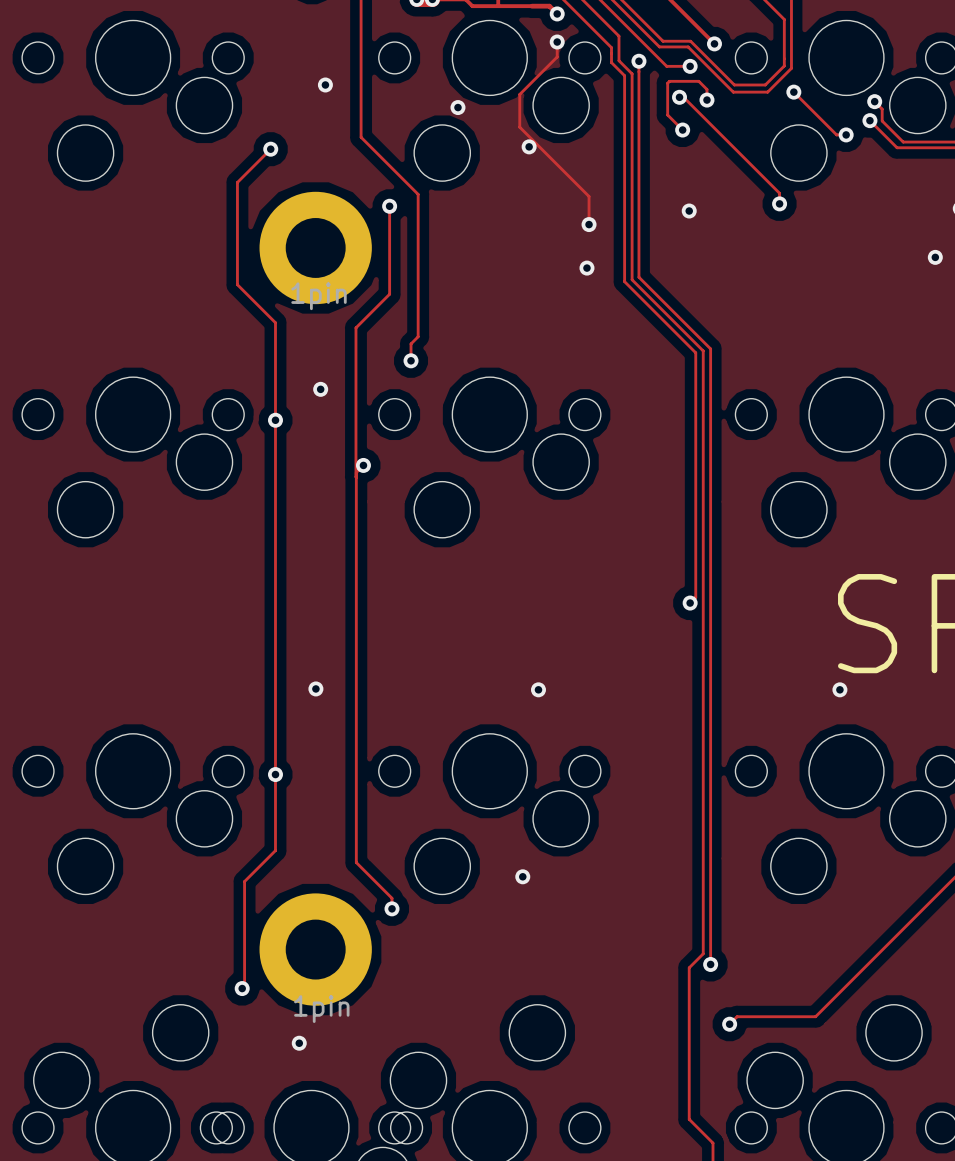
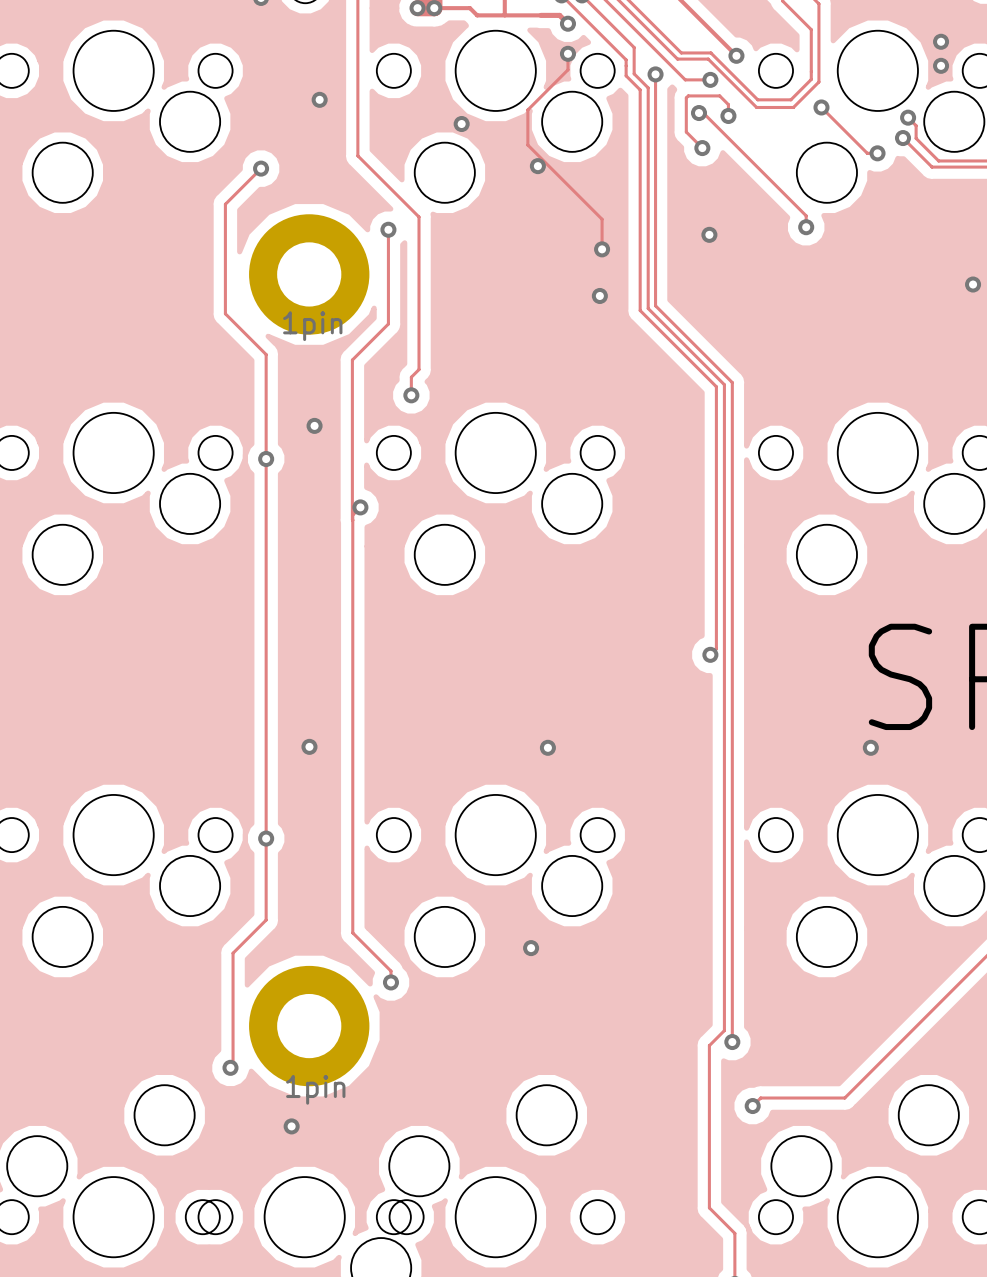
via: none -> (941, 41)
via: none -> (941, 65)

